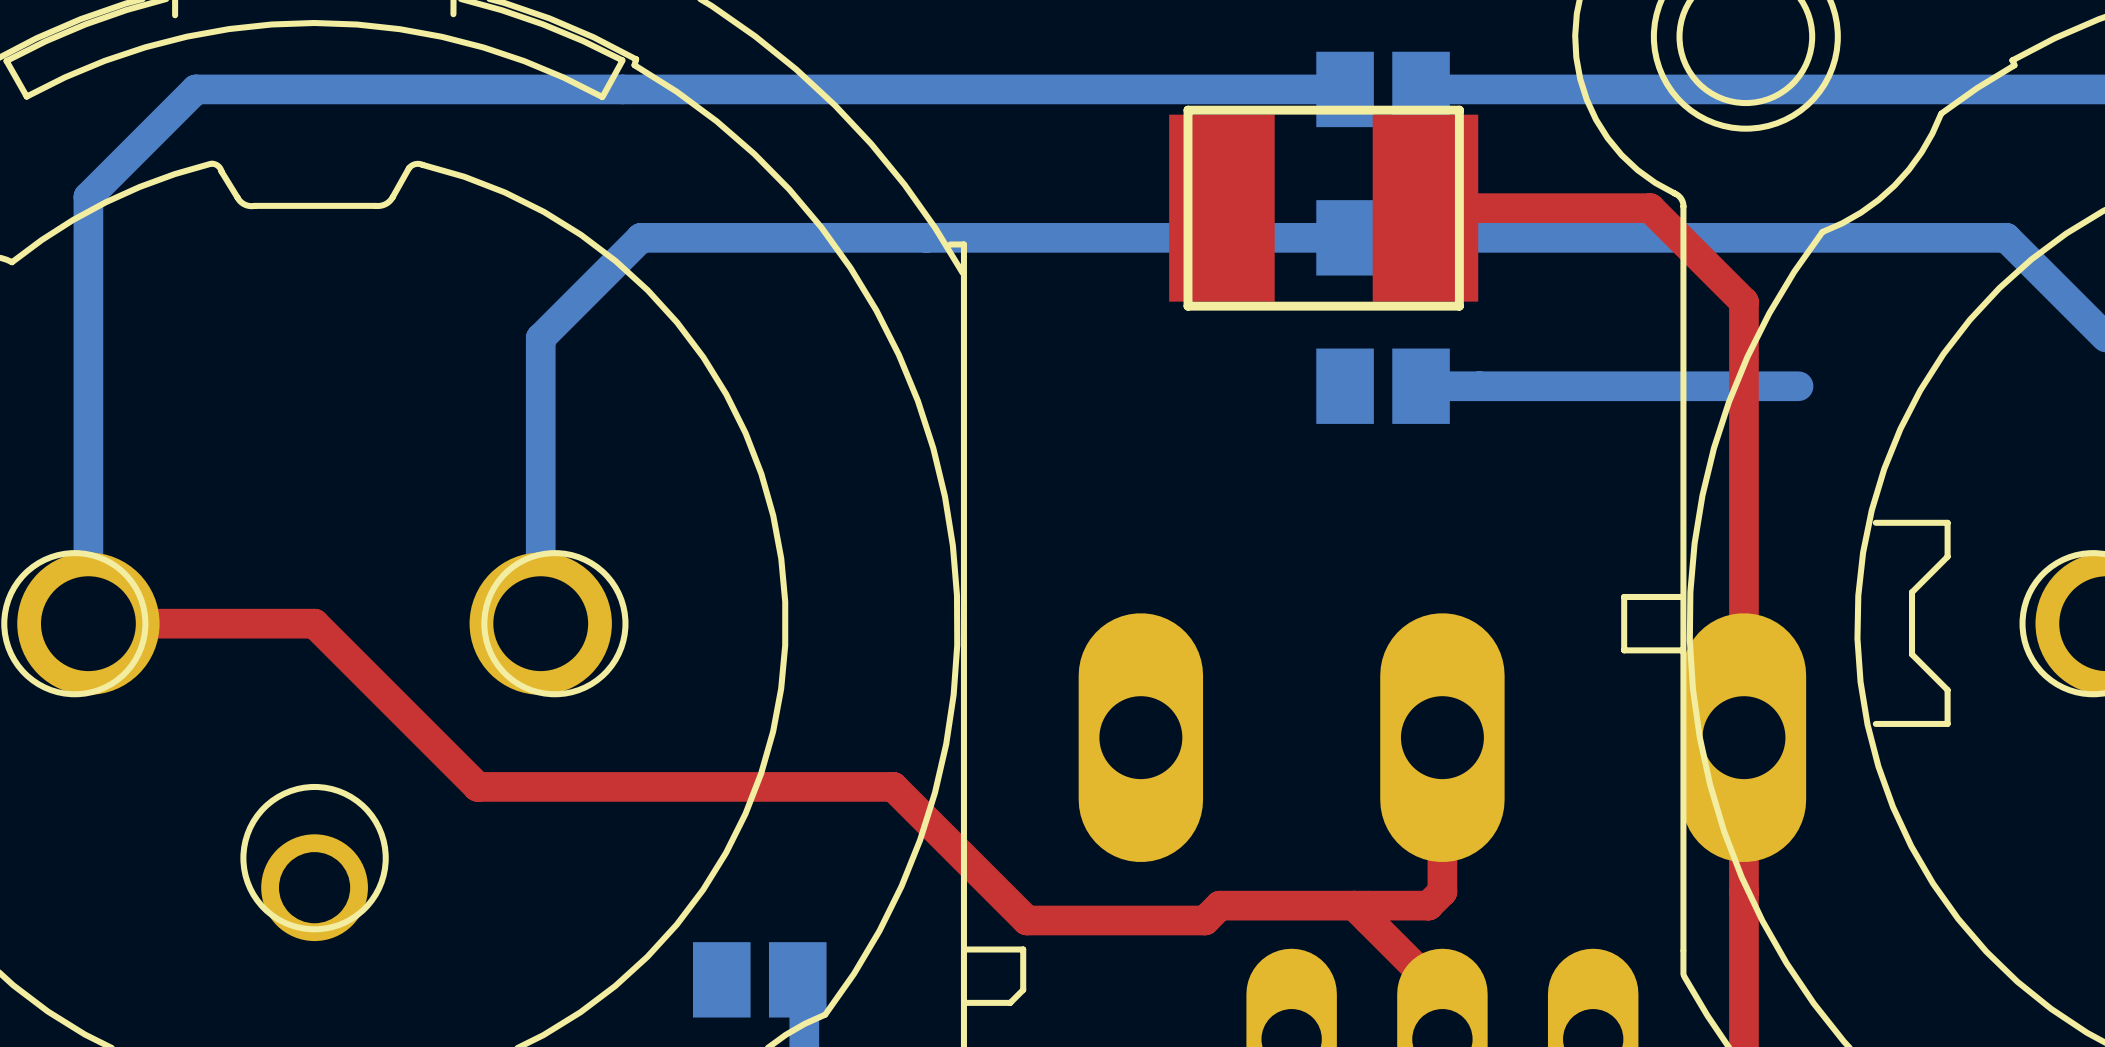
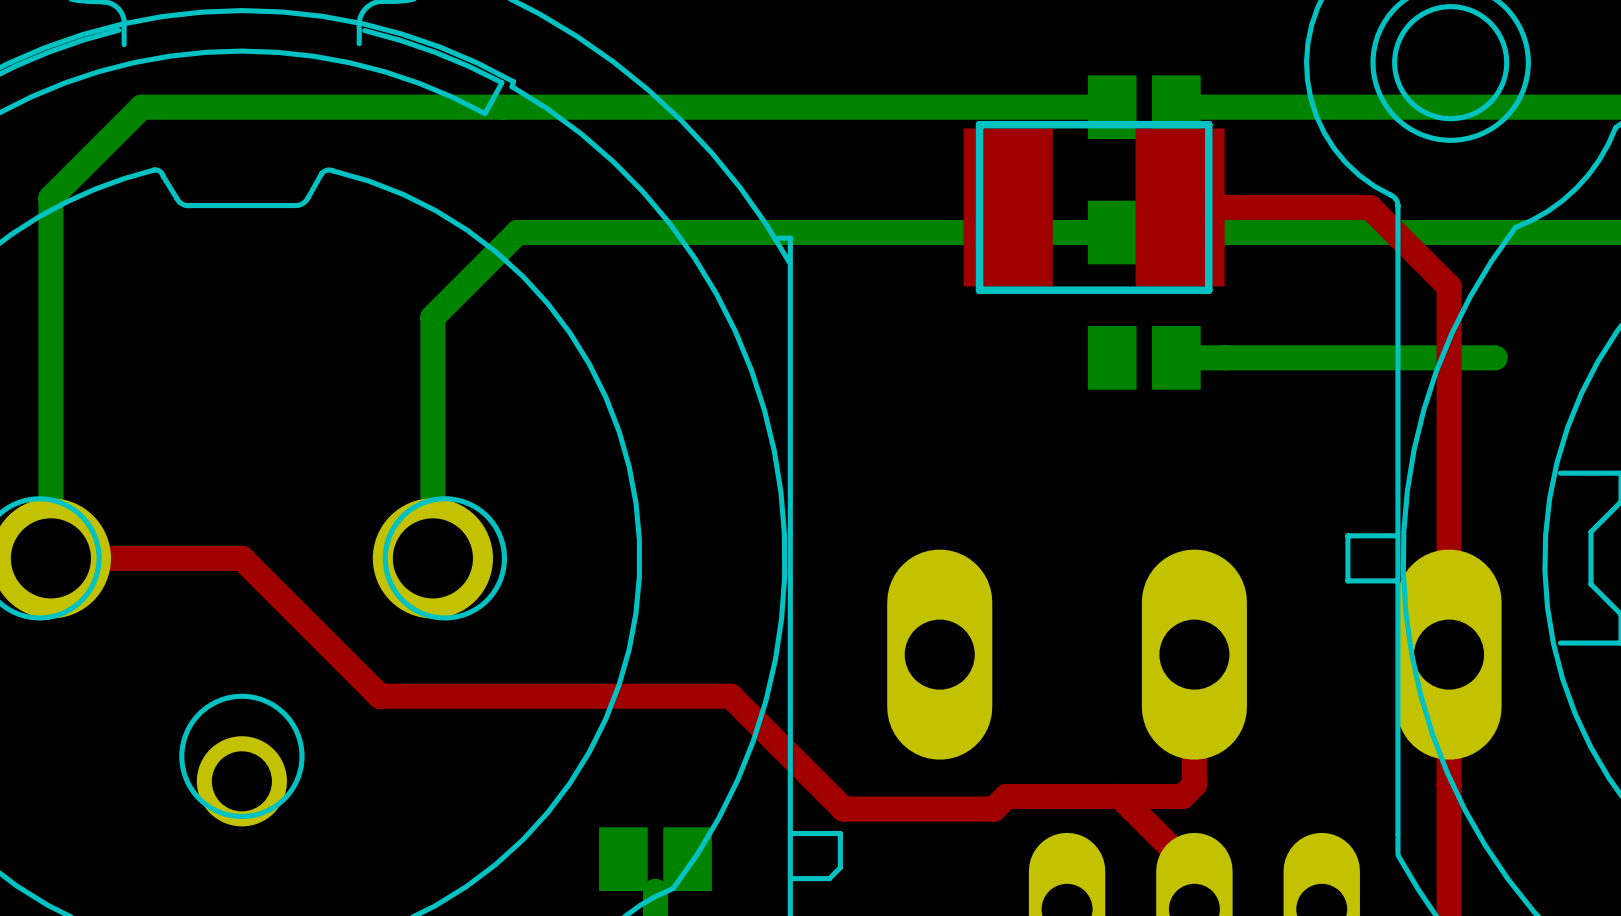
part position: (759, 979) -> (655, 859)

